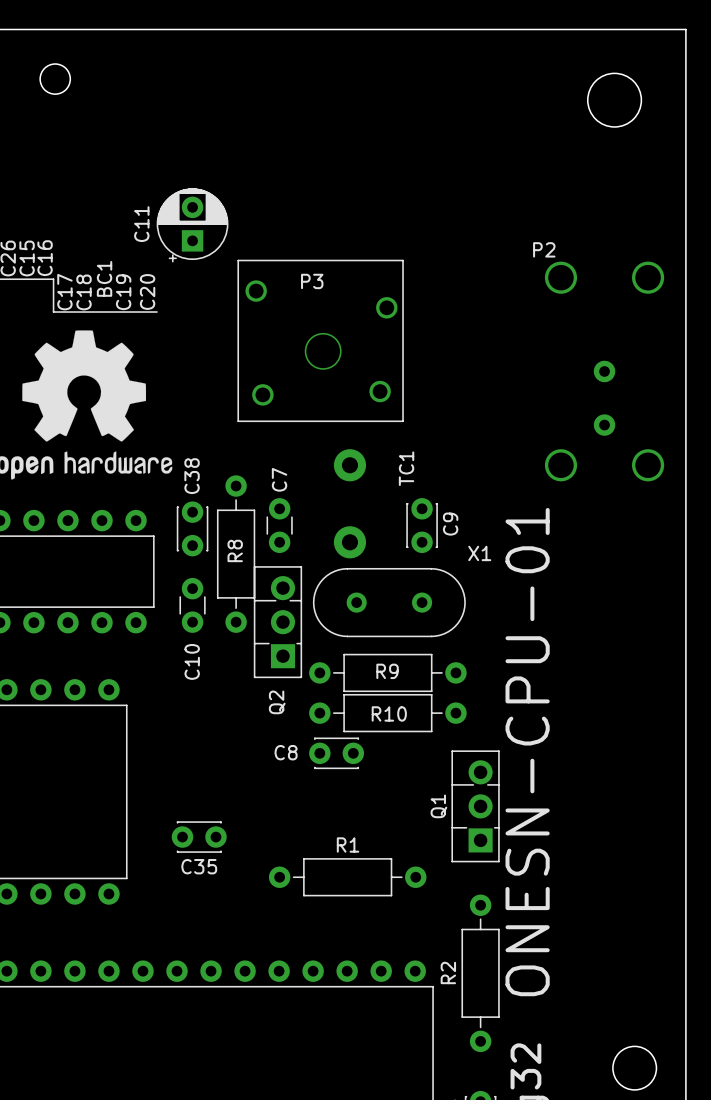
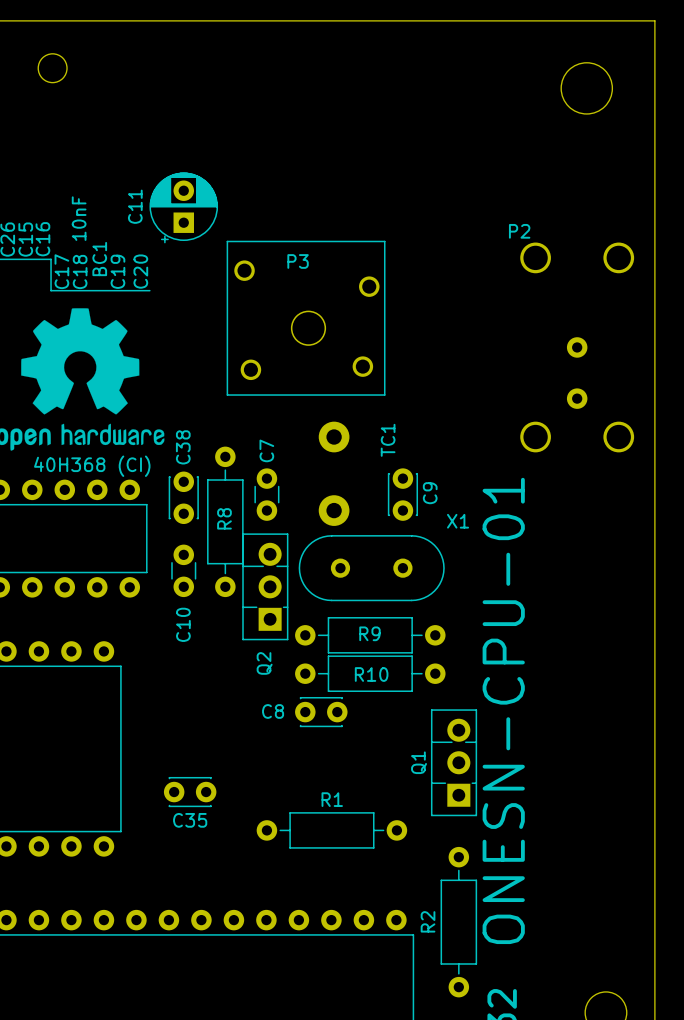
BC1 value: none -> 10nF (79, 218)
part value: none -> 40H368 (CI) (92, 466)

